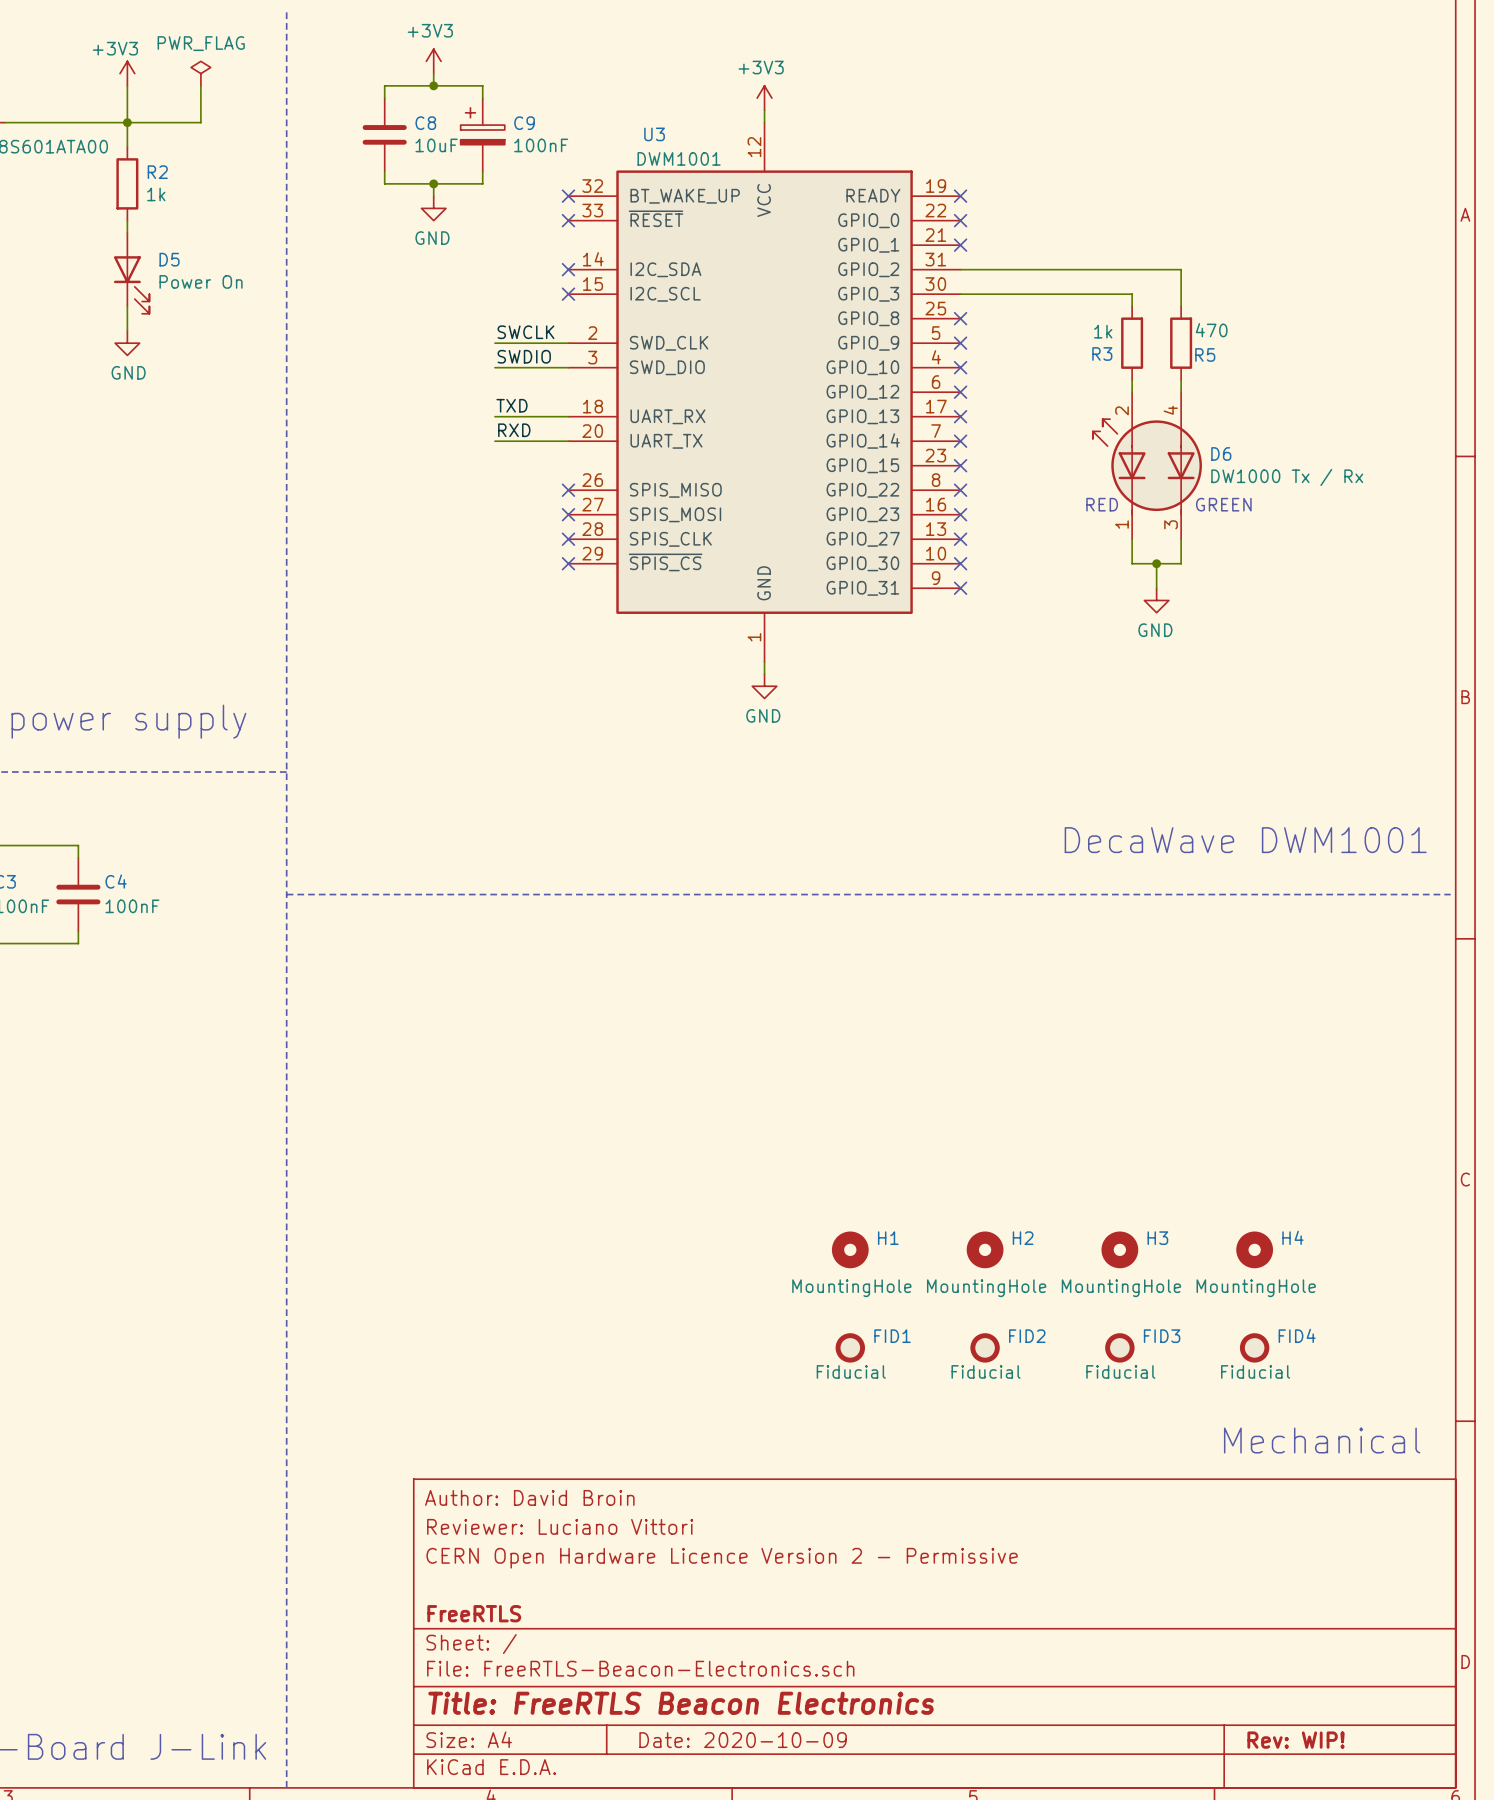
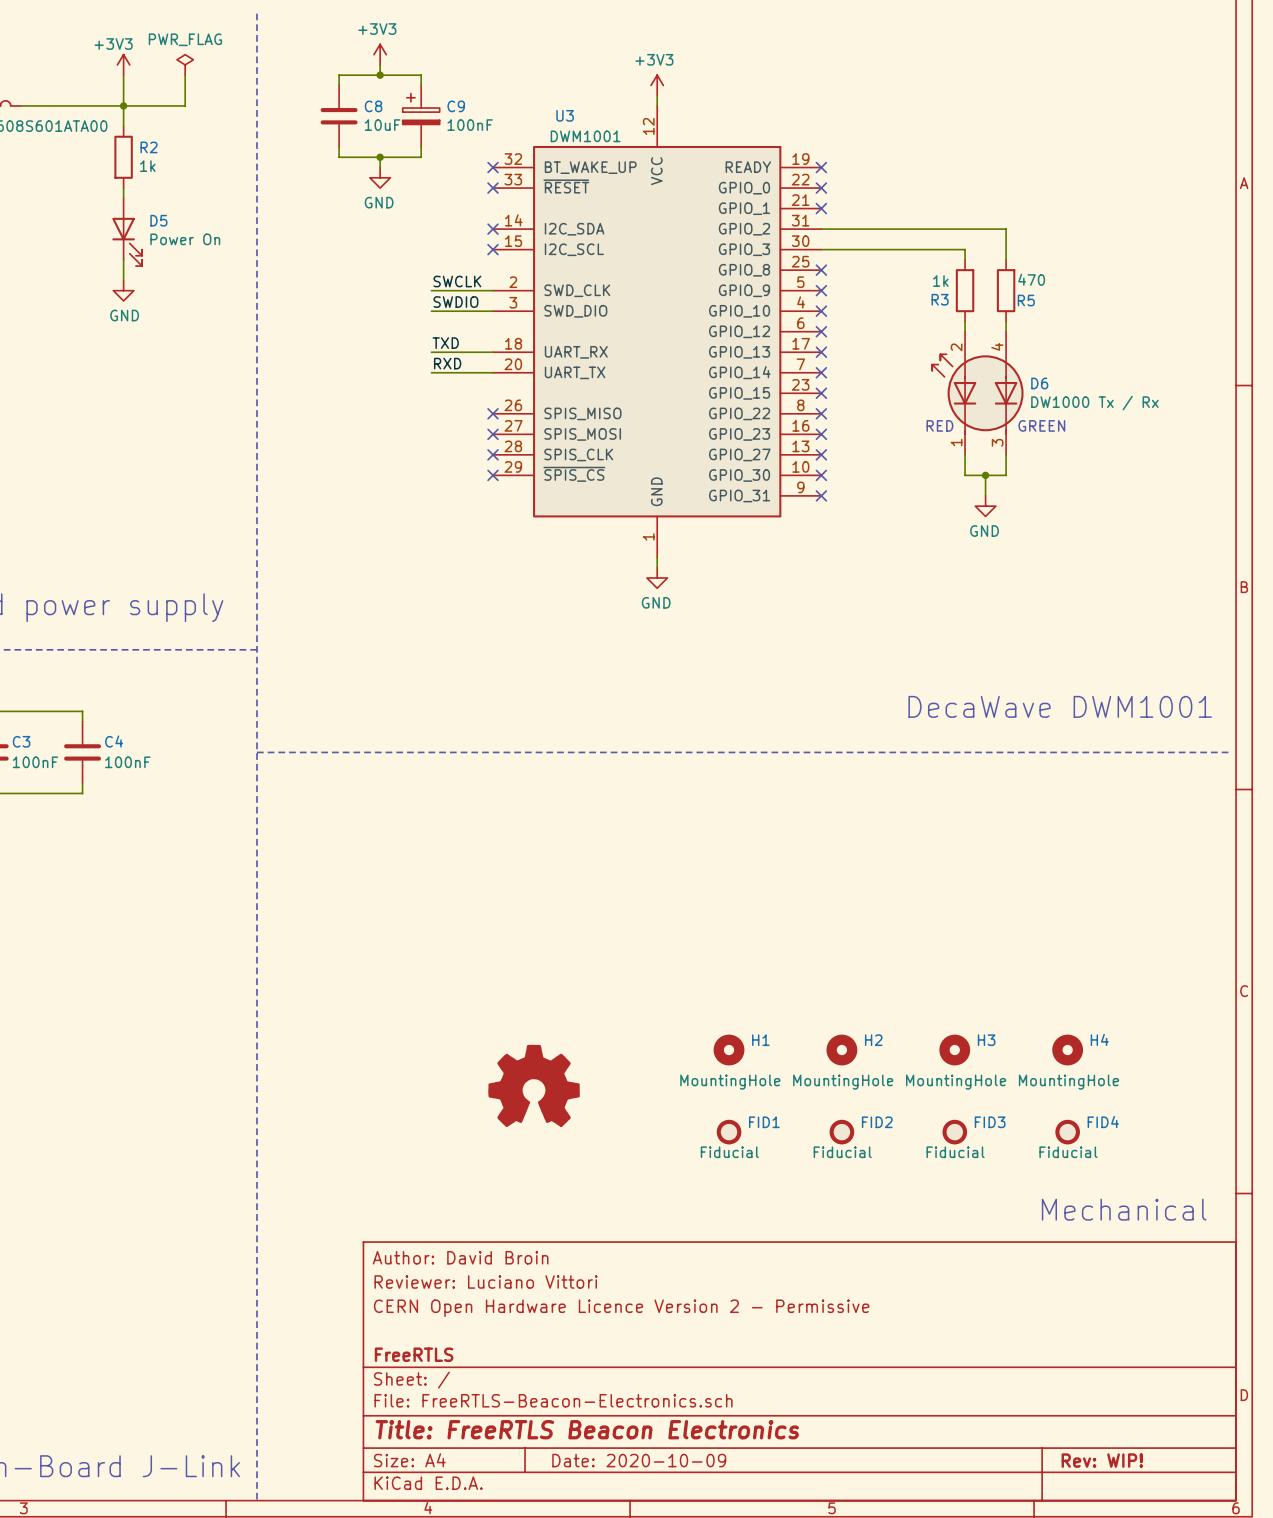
power symbol: none -> (534, 1085)

